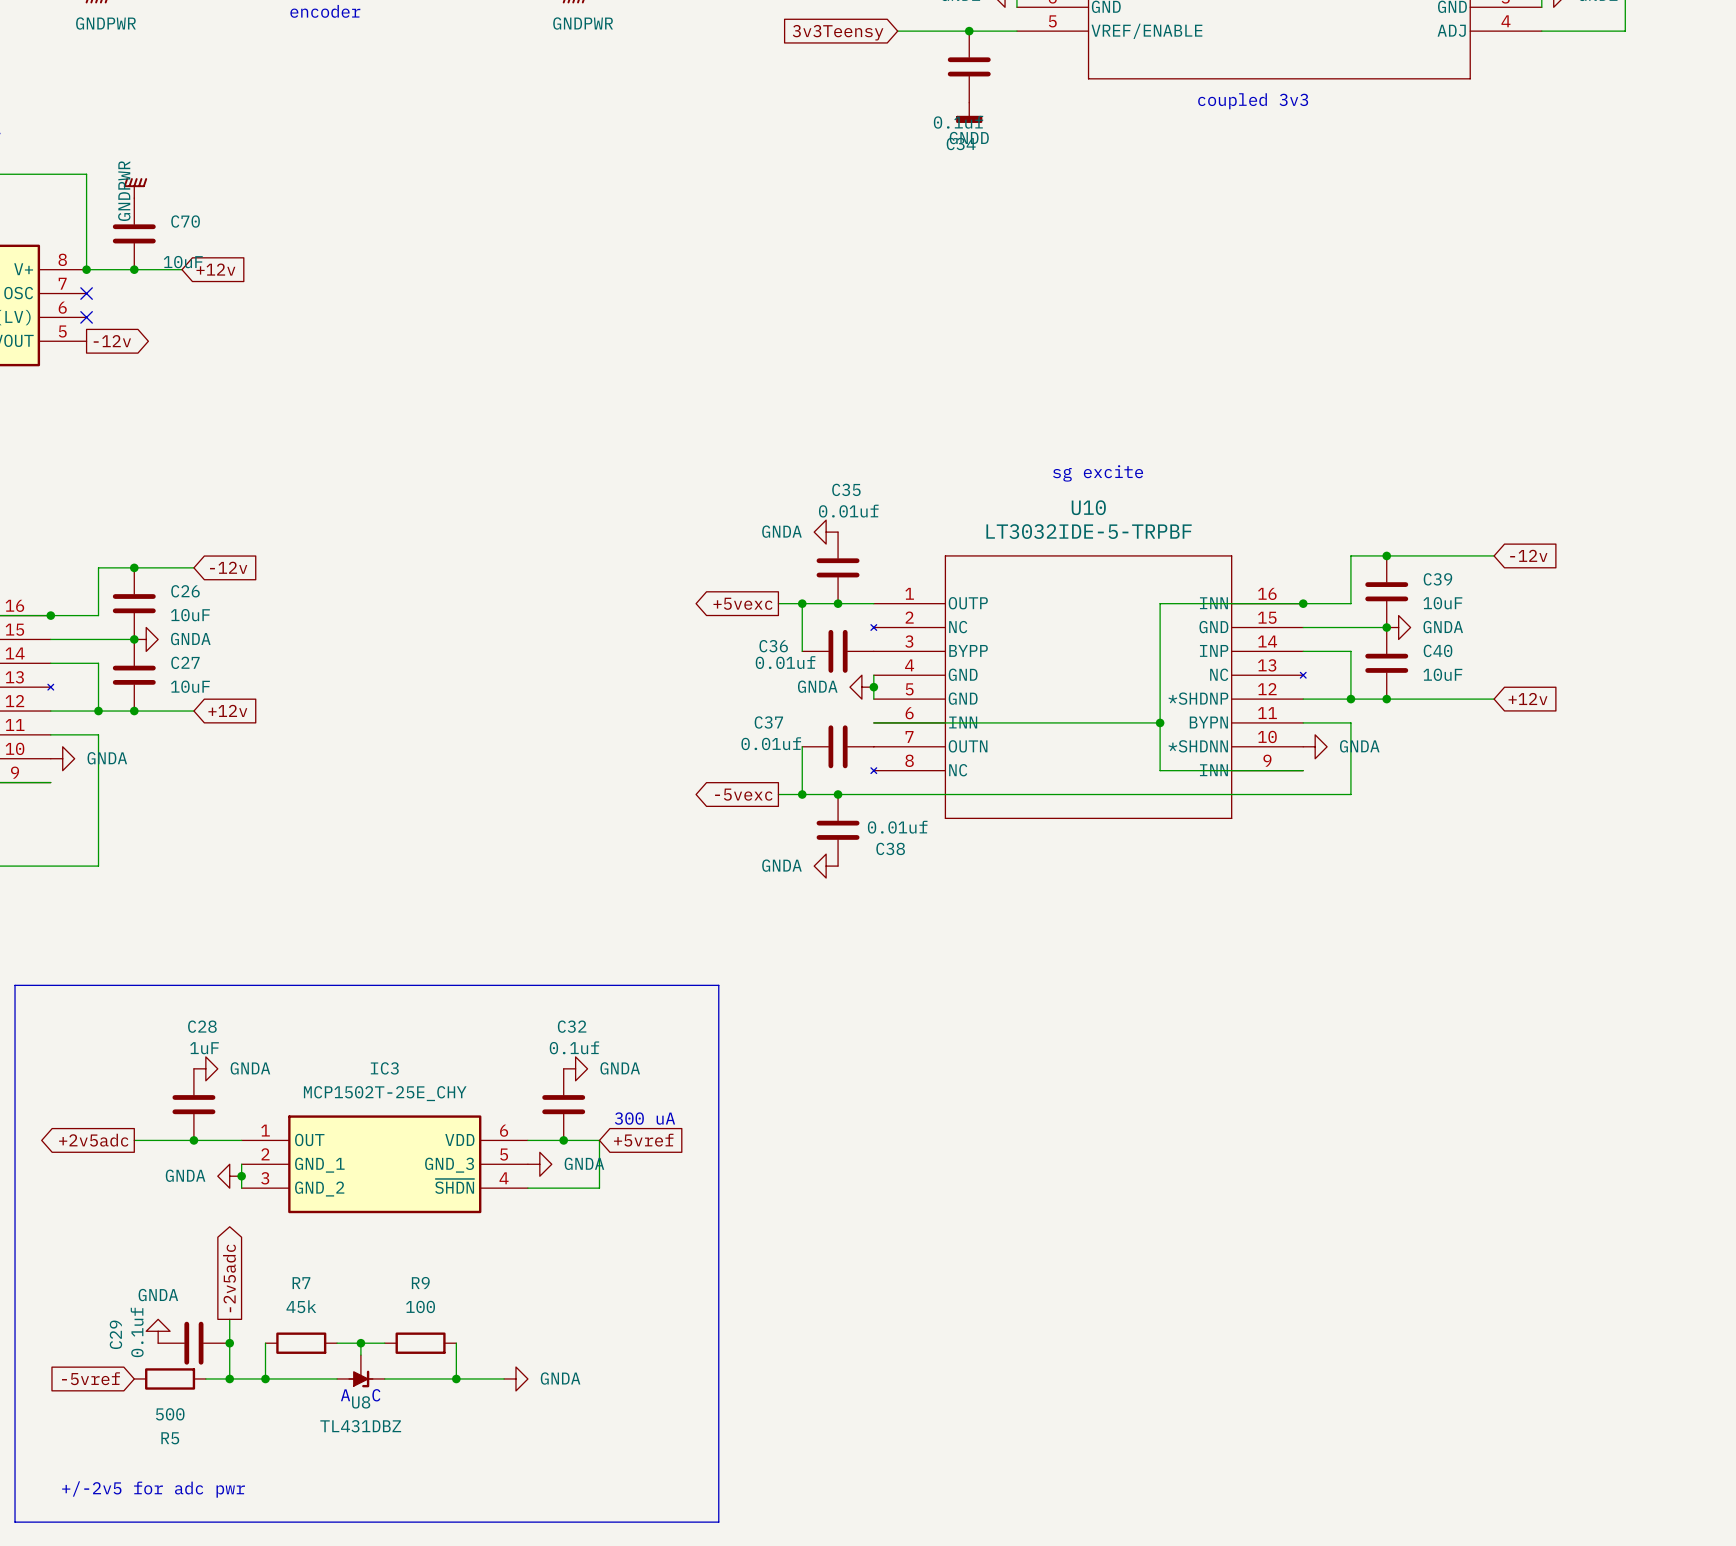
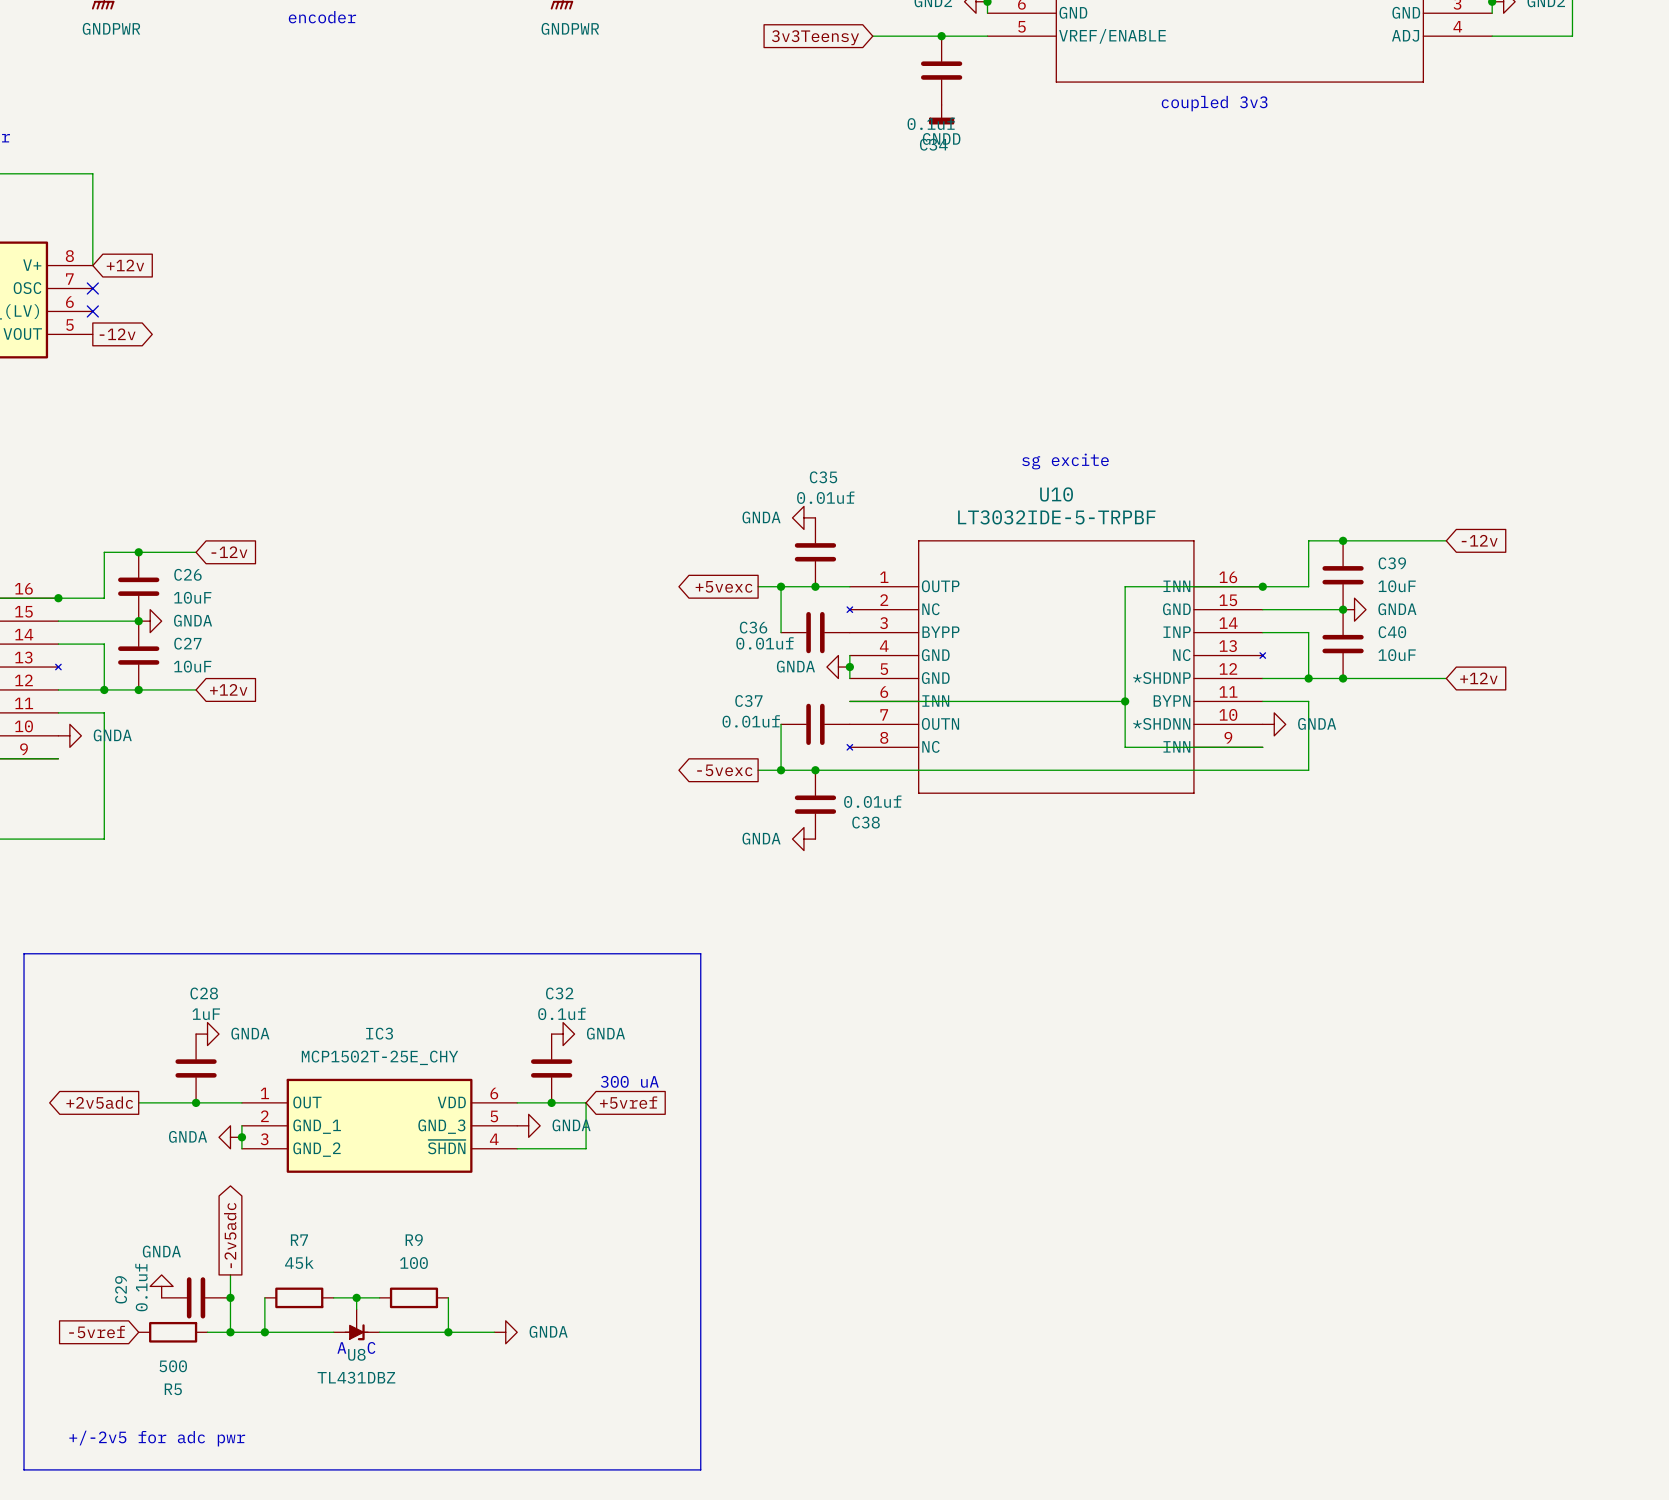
power symbol: GNDPWR (135, 188) -> none
C70: 10uF (134, 233) -> none
wire: (86, 269) (182, 269) -> none
junction: (86, 269) -> none
junction: (134, 269) -> none
global label position: +12v (215, 269) -> +12v (125, 265)

